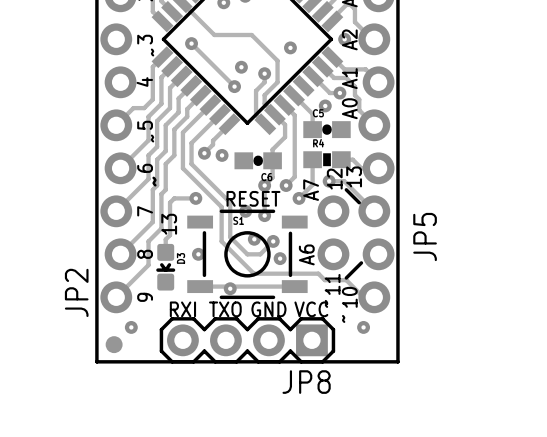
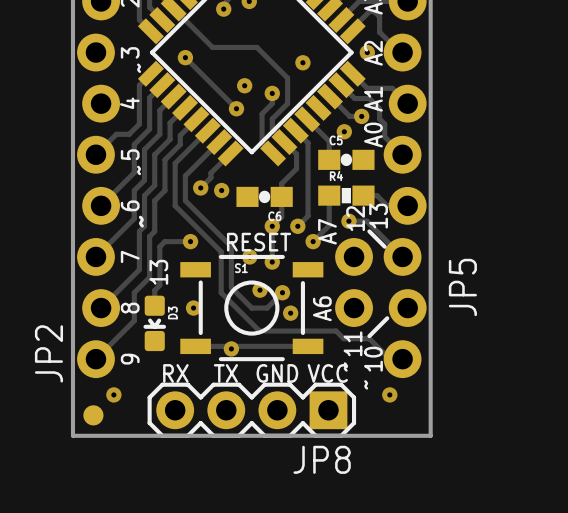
text: RXI (182, 309) -> RX (175, 373)
text: TXO (225, 309) -> TX (225, 373)

